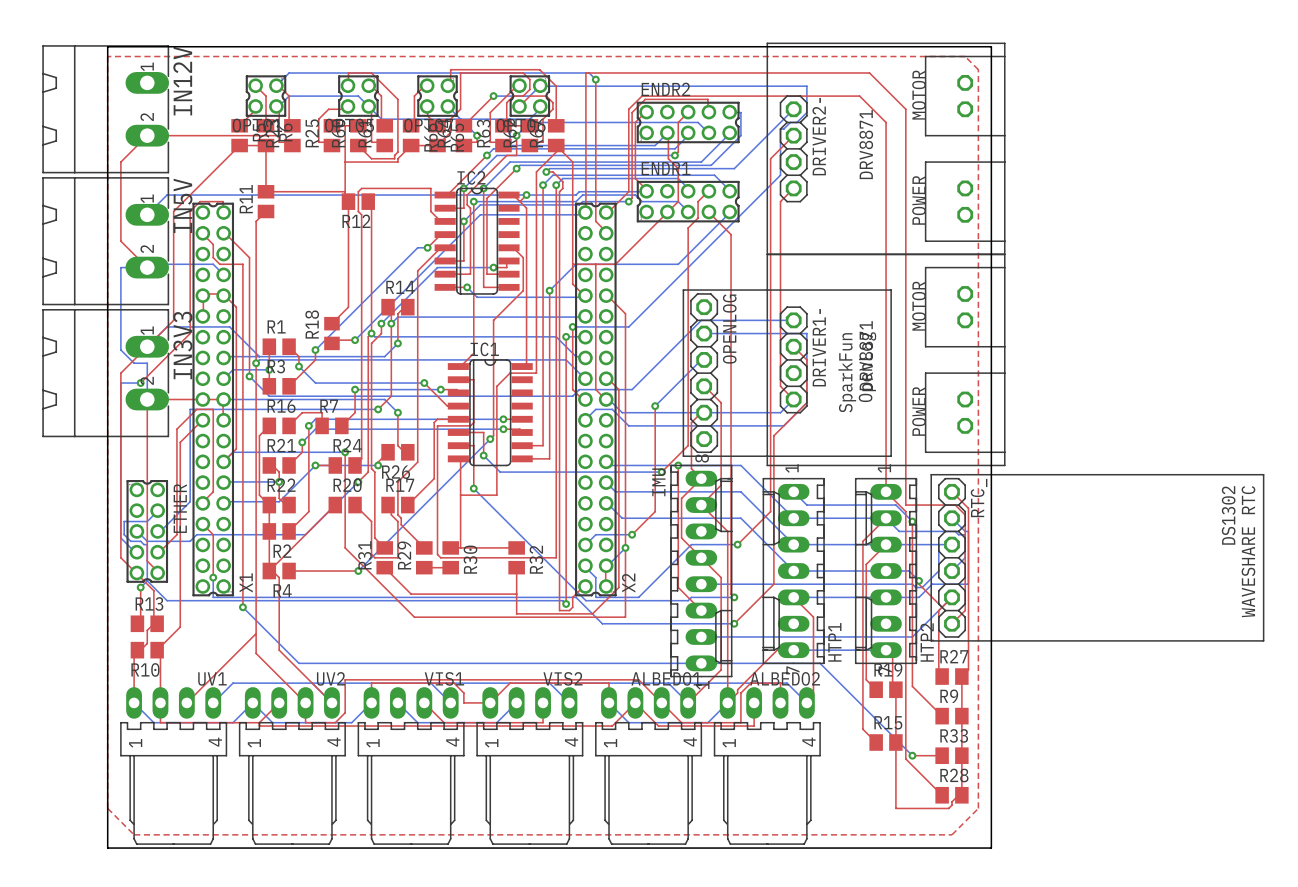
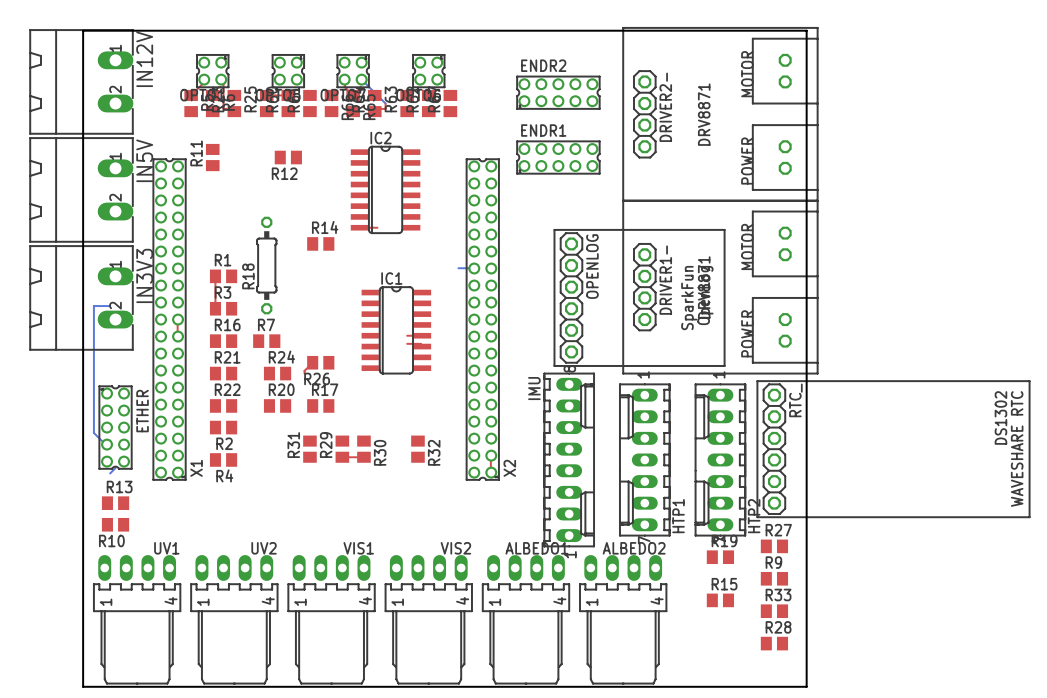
top zone outline: (107, 56) (107, 808) (134, 834) (952, 834) (978, 808) (978, 69) (965, 56) (107, 56) -> none
top track: (595, 79) (595, 221) (606, 233) -> none
bottom track: (595, 79) (589, 73) (289, 73) (276, 85) -> none
via: (595, 79) -> none
top track: (255, 85) (266, 96) (266, 125) -> none
top track: (276, 85) (289, 96) (289, 122) (292, 125) -> none
top track: (347, 85) (348, 73) (371, 73) (397, 99) (397, 152) (394, 158) (371, 158) (358, 145) -> none
top track: (368, 85) (381, 96) (381, 122) (384, 125) -> none
top track: (427, 85) (414, 96) (414, 122) (411, 125) -> none
top track: (447, 85) (450, 82) (450, 69) (539, 69) (556, 86) (556, 125) -> none
top track: (519, 85) (516, 86) (490, 112) (490, 142) (503, 142) (503, 145) -> none
top track: (493, 96) (463, 125) -> none
bottom track: (493, 96) (529, 96) (540, 85) (806, 86) (806, 112) (796, 122) (790, 122) (783, 129) (780, 129) (780, 175) (628, 326) (572, 326) -> none
via: (493, 96) -> none
bottom track: (276, 106) (289, 96) (358, 96) (381, 119) (529, 119) (540, 106) -> none
top track: (347, 106) (345, 109) (328, 109) (318, 119) (318, 142) (331, 142) (331, 145) -> none
top track: (368, 106) (371, 109) (371, 142) (384, 142) (384, 145) -> none
top track: (519, 106) (529, 96) (546, 96) (552, 102) (552, 109) (543, 119) (543, 142) (529, 142) (529, 145) -> none
bottom track: (793, 109) (734, 168) (549, 168) (546, 171) -> none
top track: (646, 112) (635, 122) (635, 178) (646, 191) -> none
top track: (688, 112) (678, 122) (678, 152) (674, 155) -> none
top track: (708, 112) (707, 99) (645, 99) (632, 112) (632, 198) (628, 201) -> none
bottom track: (729, 112) (740, 112) (740, 135) (711, 165) (519, 165) (516, 168) -> none
bottom track: (510, 119) (510, 145) (655, 145) (667, 132) -> none
top track: (345, 125) (345, 198) (348, 201) (348, 307) (331, 323) -> none
top track: (529, 125) (503, 125) (506, 125) (506, 102) (513, 96) (523, 96) (529, 89) (529, 79) (523, 73) (460, 73) (460, 109) (450, 119) (450, 132) (437, 145) (411, 145) (397, 158) (397, 162) (345, 162) -> none
top track: (667, 132) (668, 158) (678, 168) (678, 201) (615, 264) (572, 264) -> none
bottom track: (688, 132) (688, 135) (674, 148) (493, 148) (486, 155) -> none
bottom track: (708, 132) (698, 122) (529, 122) (516, 135) -> none
bottom track: (729, 132) (701, 162) (510, 162) (483, 188) -> none
top track: (279, 135) (147, 135) (120, 162) (120, 241) (147, 267) -> none
via: (477, 135) -> none
top track: (516, 135) (516, 155) (506, 155) (467, 195) (467, 204) (470, 208) (470, 274) (445, 274) -> none
via: (516, 135) -> none
top track: (793, 135) (770, 158) (770, 511) (737, 544) -> none
top track: (486, 155) (447, 195) (445, 195) -> none
via: (486, 155) -> none
bottom track: (674, 155) (496, 155) (463, 188) -> none
via: (674, 155) -> none
top track: (516, 168) (486, 198) (486, 274) (509, 274) -> none
via: (516, 168) -> none
top track: (546, 171) (552, 171) (562, 181) (562, 188) (559, 191) (559, 610) (569, 610) (572, 607) (572, 597) (585, 586) -> none
via: (546, 171) -> none
top track: (543, 185) (543, 445) (522, 445) -> none
bottom track: (543, 185) (552, 175) (714, 175) (729, 191) -> none
via: (543, 185) -> none
top track: (556, 185) (556, 557) (440, 557) (437, 554) (437, 425) (470, 425) (473, 422) (473, 379) (458, 379) -> none
bottom track: (556, 185) (562, 178) (678, 178) (688, 188) (688, 191) -> none
via: (556, 185) -> none
top track: (463, 188) (463, 208) (445, 208) -> none
via: (463, 188) -> none
top track: (483, 188) (483, 287) (509, 287) -> none
via: (483, 188) -> none
top track: (793, 188) (780, 201) (780, 386) (793, 399) -> none
top track: (345, 191) (266, 191) (266, 145) (239, 145) (173, 211) (173, 320) (120, 373) (120, 557) (153, 590) (153, 623) -> none
bottom track: (646, 191) (579, 191) (576, 195) (167, 195) (147, 214) -> none
top track: (708, 191) (698, 201) (698, 218) (688, 228) (688, 445) (661, 472) -> none
top track: (509, 195) (513, 195) (526, 208) (526, 363) (522, 366) -> none
top track: (526, 195) (519, 201) -> none
via: (526, 195) -> none
top track: (368, 201) (371, 204) (371, 333) (368, 336) (368, 472) (358, 481) -> none
top track: (473, 201) (473, 353) (458, 366) -> none
bottom track: (473, 201) (576, 201) (582, 195) (635, 195) (641, 201) (678, 201) (688, 212) -> none
via: (473, 201) -> none
bottom track: (628, 201) (582, 201) (579, 204) (480, 204) (463, 221) -> none
via: (628, 201) -> none
top track: (266, 211) (256, 221) (256, 653) (305, 702) (305, 722) (335, 722) (345, 712) (345, 679) (638, 679) (681, 722) (740, 722) (740, 693) (750, 683) (780, 683) (780, 702) -> none
top track: (223, 212) (223, 201) (200, 201) (190, 211) (190, 333) (140, 383) -> none
top track: (585, 212) (585, 73) (869, 73) (905, 109) (905, 505) (955, 505) (965, 514) (965, 610) (952, 623) -> none
bottom track: (585, 212) (582, 214) (480, 214) (355, 340) -> none
top track: (606, 212) (628, 191) (628, 109) (641, 96) (859, 96) (886, 122) (886, 491) (905, 511) (905, 758) (942, 795) -> none
top track: (708, 212) (731, 234) (731, 594) (734, 597) -> none
bottom track: (729, 212) (678, 264) (576, 264) (549, 290) -> none
top track: (445, 221) (440, 221) (430, 211) (430, 188) (361, 188) (358, 191) (358, 211) (361, 214) (361, 458) (355, 465) -> none
top track: (463, 221) (463, 260) (445, 260) -> none
via: (463, 221) -> none
top track: (202, 233) (213, 244) (213, 257) (219, 264) (242, 264) (242, 607) -> none
top track: (223, 233) (249, 257) (249, 376) -> none
top track: (445, 234) (440, 234) (427, 247) -> none
bottom track: (427, 247) (417, 247) (315, 350) -> none
via: (427, 247) -> none
top track: (445, 247) (440, 247) (417, 270) (417, 462) (397, 481) (397, 514) (401, 518) (401, 524) (424, 547) -> none
top track: (509, 247) (513, 247) (523, 257) (523, 290) (493, 320) (493, 435) (490, 439) -> none
top track: (509, 260) (506, 260) (506, 267) (493, 267) -> none
top track: (595, 264) (595, 389) (606, 399) -> none
bottom track: (493, 267) (437, 267) (381, 323) -> none
via: (493, 267) -> none
bottom track: (223, 274) (213, 264) (150, 264) (147, 267) (120, 267) (120, 350) (134, 363) (147, 363) (147, 399) -> none
bottom track: (467, 287) (477, 297) (582, 297) (585, 295) -> none
via: (467, 287) -> none
top track: (549, 290) (549, 458) (522, 458) -> none
via: (549, 290) -> none
top track: (585, 295) (572, 284) (572, 162) (556, 145) (559, 148) (536, 171) (536, 373) (510, 373) (496, 386) (496, 495) (460, 495) -> none
top track: (606, 295) (625, 313) (625, 617) (414, 617) (345, 547) (345, 452) -> none
top track: (388, 307) (391, 307) (391, 396) (378, 409) -> none
top track: (407, 307) (404, 307) (397, 313) (397, 343) -> none
top track: (202, 316) (203, 293) (223, 293) (236, 307) (236, 448) (223, 461) -> none
R18 footprint: [324, 316, 340, 351] -> [256, 216, 278, 315]
bottom track: (585, 316) (397, 317) (391, 323) -> none
bottom track: (793, 320) (701, 320) (632, 389) (579, 389) (572, 396) (269, 396) (249, 376) -> none
top track: (381, 323) (381, 333) (371, 343) (371, 468) (374, 472) (374, 538) (384, 547) -> none
via: (381, 323) -> none
via: (391, 323) -> none
R18 name position: R18 (312, 324) -> R18 (248, 276)
top track: (572, 326) (572, 389) (582, 399) (585, 399) -> none
via: (572, 326) -> none
bottom track: (371, 333) (374, 336) (556, 336) (576, 356) (585, 357) -> none
via: (371, 333) -> none
bottom track: (704, 333) (806, 333) (806, 402) (783, 425) (628, 425) (612, 409) (595, 409) (585, 420) -> none
top track: (566, 336) (566, 603) -> none
via: (566, 336) -> none
top track: (355, 340) (331, 340) (331, 343) -> none
via: (355, 340) -> none
bottom track: (397, 343) (384, 356) (223, 357) -> none
via: (397, 343) -> none
bottom track: (147, 346) (167, 326) (229, 326) (259, 356) -> none
top track: (289, 346) (298, 356) (298, 366) -> none
top track: (793, 346) (806, 359) (806, 402) (773, 435) (773, 584) (734, 623) -> none
top track: (315, 350) (315, 359) (289, 386) -> none
via: (315, 350) -> none
bottom track: (704, 359) (701, 359) (655, 406) -> none
bottom track: (256, 363) (259, 359) (566, 359) (585, 378) -> none
via: (256, 363) -> none
bottom track: (298, 366) (315, 383) (424, 383) -> none
via: (298, 366) -> none
bottom track: (269, 369) (233, 369) (223, 378) -> none
via: (269, 369) -> none
via: (249, 376) -> none
top track: (606, 378) (618, 389) (618, 587) (592, 613) (516, 613) (516, 567) -> none
via: (140, 383) -> none
top track: (424, 383) (447, 406) (458, 406) -> none
via: (424, 383) -> none
top track: (704, 386) (721, 402) (721, 485) (701, 505) (727, 531) (727, 702) (737, 693) (737, 689) (777, 650) (793, 650) -> none
top track: (355, 389) (355, 412) (341, 425) -> none
bottom track: (355, 389) (440, 389) -> none
via: (355, 389) -> none
top track: (440, 389) (457, 389) (458, 392) -> none
via: (440, 389) -> none
top track: (223, 399) (147, 399) (147, 561) (157, 572) -> none
bottom track: (223, 399) (384, 399) (397, 412) -> none
bottom track: (606, 399) (609, 399) (622, 412) (780, 412) (793, 399) -> none
top track: (655, 406) (655, 511) (632, 534) -> none
via: (655, 406) -> none
bottom track: (378, 409) (190, 409) (190, 501) (160, 531) (157, 531) -> none
via: (378, 409) -> none
top track: (397, 412) (397, 445) (404, 452) (407, 452) -> none
via: (397, 412) -> none
top track: (704, 412) (701, 412) (691, 422) (691, 468) (701, 478) (681, 498) (681, 538) (721, 577) (721, 669) (688, 702) -> none
top track: (458, 419) (437, 419) (434, 422) (434, 478) (407, 505) -> none
bottom track: (503, 419) (315, 419) (308, 425) -> none
via: (503, 419) -> none
top track: (202, 420) (180, 442) (180, 627) (157, 650) (160, 653) (160, 722) (259, 722) -> none
top track: (269, 425) (259, 435) (259, 495) (269, 505) (269, 571) (272, 571) -> none
top track: (289, 425) (302, 412) (322, 412) (322, 425) -> none
top track: (308, 425) (308, 511) (289, 531) -> none
via: (308, 425) -> none
bottom track: (503, 429) (315, 429) (302, 442) -> none
via: (503, 429) -> none
top track: (458, 432) (483, 432) (483, 455) -> none
bottom track: (490, 439) (358, 571) -> none
via: (490, 439) -> none
top track: (302, 442) (302, 452) (289, 465) -> none
via: (302, 442) -> none
top track: (458, 445) (473, 445) (473, 488) -> none
bottom track: (345, 452) (233, 452) (223, 461) -> none
via: (345, 452) -> none
bottom track: (483, 455) (500, 472) (661, 472) -> none
via: (483, 455) -> none
top track: (458, 458) (460, 458) (460, 547) -> none
bottom track: (606, 461) (612, 465) (740, 465) (793, 518) (886, 518) (899, 531) (955, 531) (958, 534) (965, 534) (965, 557) (952, 571) -> none
top track: (269, 465) (272, 465) (279, 472) (279, 498) (285, 505) (289, 505) -> none
top track: (315, 465) (335, 465) -> none
via: (315, 465) -> none
bottom track: (378, 465) (315, 465) (279, 501) (226, 501) (223, 503) -> none
via: (378, 465) -> none
top track: (678, 465) (678, 587) (701, 610) -> none
via: (678, 465) -> none
via: (661, 472) -> none
bottom track: (279, 481) (223, 482) -> none
via: (279, 481) -> none
bottom track: (358, 481) (305, 534) (196, 534) (190, 541) (147, 541) (136, 531) -> none
via: (358, 481) -> none
bottom track: (606, 482) (615, 491) (740, 491) (793, 544) (952, 544) -> none
bottom track: (473, 488) (585, 600) (688, 600) (691, 597) (734, 597) -> none
via: (473, 488) -> none
bottom track: (793, 491) (806, 505) (895, 505) (912, 521) -> none
top track: (952, 491) (968, 508) (968, 669) (961, 676) (961, 795) (958, 795) (952, 801) (948, 808) (895, 808) (895, 689) (892, 689) (892, 656) (886, 650) -> none
top track: (202, 503) (213, 491) (213, 409) (196, 409) (176, 429) (176, 534) (157, 552) -> none
bottom track: (606, 503) (622, 518) (740, 518) (793, 571) (909, 571) (919, 580) -> none
top track: (335, 505) (272, 567) (272, 571) -> none
top track: (355, 505) (371, 521) (371, 554) (374, 557) (397, 557) (397, 521) (391, 514) (391, 505) (388, 505) -> none
bottom track: (157, 510) (147, 521) (124, 521) (124, 534) (130, 541) (140, 541) (147, 544) (147, 580) (167, 600) (562, 600) (566, 603) -> none
top track: (886, 518) (862, 541) (862, 729) (876, 742) -> none
bottom track: (952, 518) (965, 531) (968, 531) (968, 584) (932, 584) (919, 597) (793, 597) -> none
top track: (912, 521) (912, 686) (942, 716) -> none
via: (912, 521) -> none
top track: (202, 524) (213, 534) (213, 577) -> none
bottom track: (632, 534) (595, 534) (585, 544) -> none
via: (632, 534) -> none
bottom track: (737, 544) (691, 544) (638, 597) (595, 597) (595, 577) (585, 565) -> none
via: (737, 544) -> none
top track: (886, 544) (866, 564) (866, 679) (876, 689) -> none
bottom track: (938, 544) (938, 571) (922, 587) (915, 587) (912, 584) (701, 584) -> none
top track: (450, 547) (516, 547) -> none
bottom track: (625, 547) (606, 565) -> none
via: (625, 547) -> none
top track: (384, 567) (411, 594) (516, 594) -> none
top track: (272, 571) (279, 577) (279, 650) (331, 702) -> none
top track: (289, 571) (358, 571) -> none
via: (358, 571) -> none
bottom track: (213, 577) (213, 597) (576, 597) (602, 623) (734, 623) -> none
via: (213, 577) -> none
top track: (919, 580) (919, 584) (942, 607) -> none
via: (919, 580) -> none
top track: (140, 587) (140, 623) (137, 623) -> none
via: (140, 587) -> none
via: (734, 597) -> none
top track: (793, 597) (813, 617) (813, 696) (806, 702) -> none
top track: (952, 597) (938, 610) (938, 673) (942, 676) -> none
bottom track: (952, 597) (912, 636) (701, 636) -> none
via: (566, 603) -> none
bottom track: (242, 607) (298, 663) (820, 663) (912, 755) -> none
via: (242, 607) -> none
top track: (153, 623) (147, 630) (147, 643) (134, 653) (134, 702) -> none
via: (734, 623) -> none
top track: (256, 633) (186, 702) -> none
bottom track: (793, 650) (886, 650) -> none
bottom track: (430, 683) (450, 702) -> none
bottom track: (549, 683) (569, 702) -> none
bottom track: (668, 683) (688, 702) -> none
bottom track: (134, 702) (153, 722) (233, 722) (252, 702) (272, 722) (351, 722) (371, 702) -> none
bottom track: (213, 702) (233, 683) (787, 683) (806, 702) -> none
top track: (279, 702) (259, 722) -> none
top track: (371, 702) (371, 683) (453, 683) (463, 693) (463, 702) (490, 702) (510, 683) (609, 683) (609, 702) -> none
bottom track: (397, 702) (417, 722) (496, 722) (516, 702) -> none
top track: (424, 702) (444, 722) (543, 722) (543, 702) -> none
bottom track: (609, 702) (628, 722) (707, 722) (727, 702) -> none
top track: (754, 702) (754, 726) (658, 726) (635, 702) (612, 726) (259, 726) (259, 722) -> none
top track: (912, 755) (942, 755) -> none
via: (912, 755) -> none

